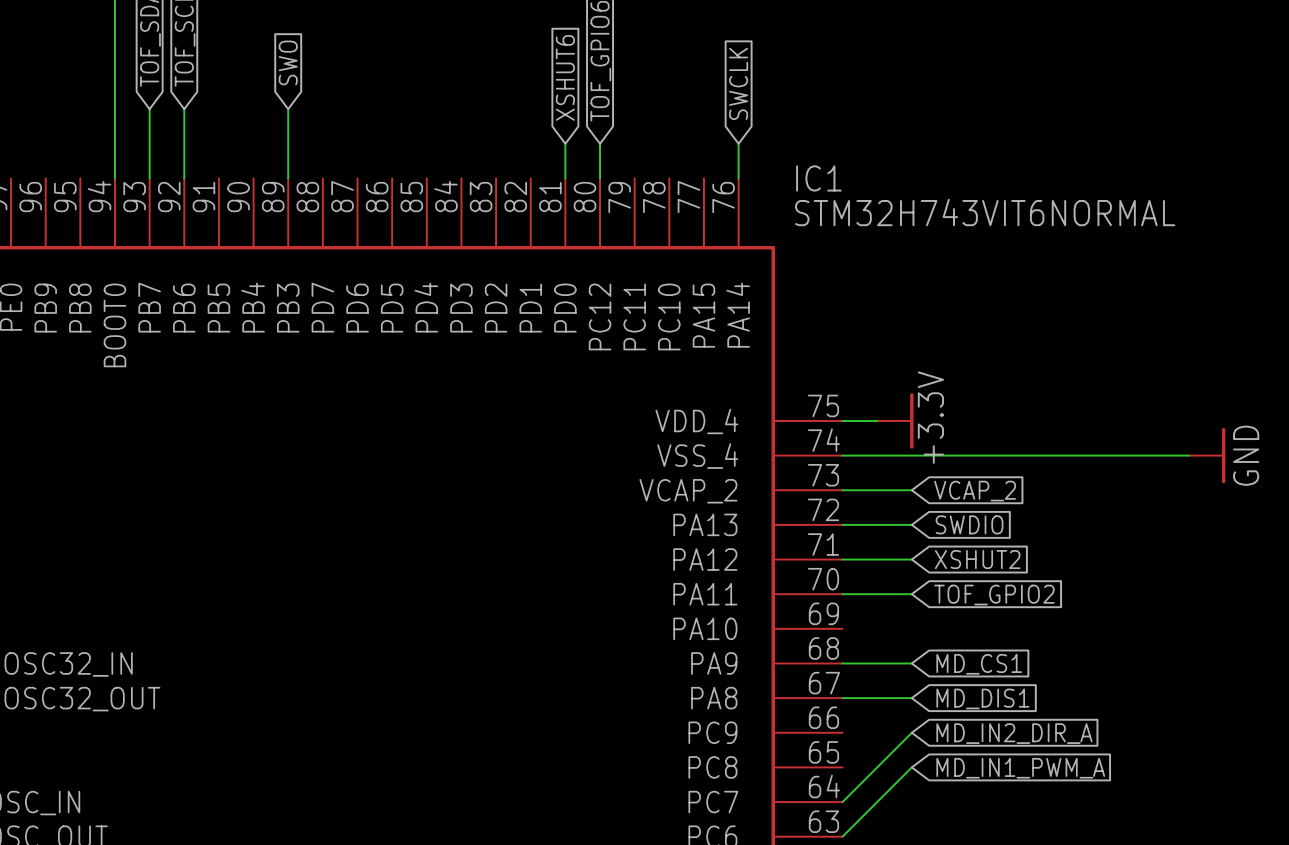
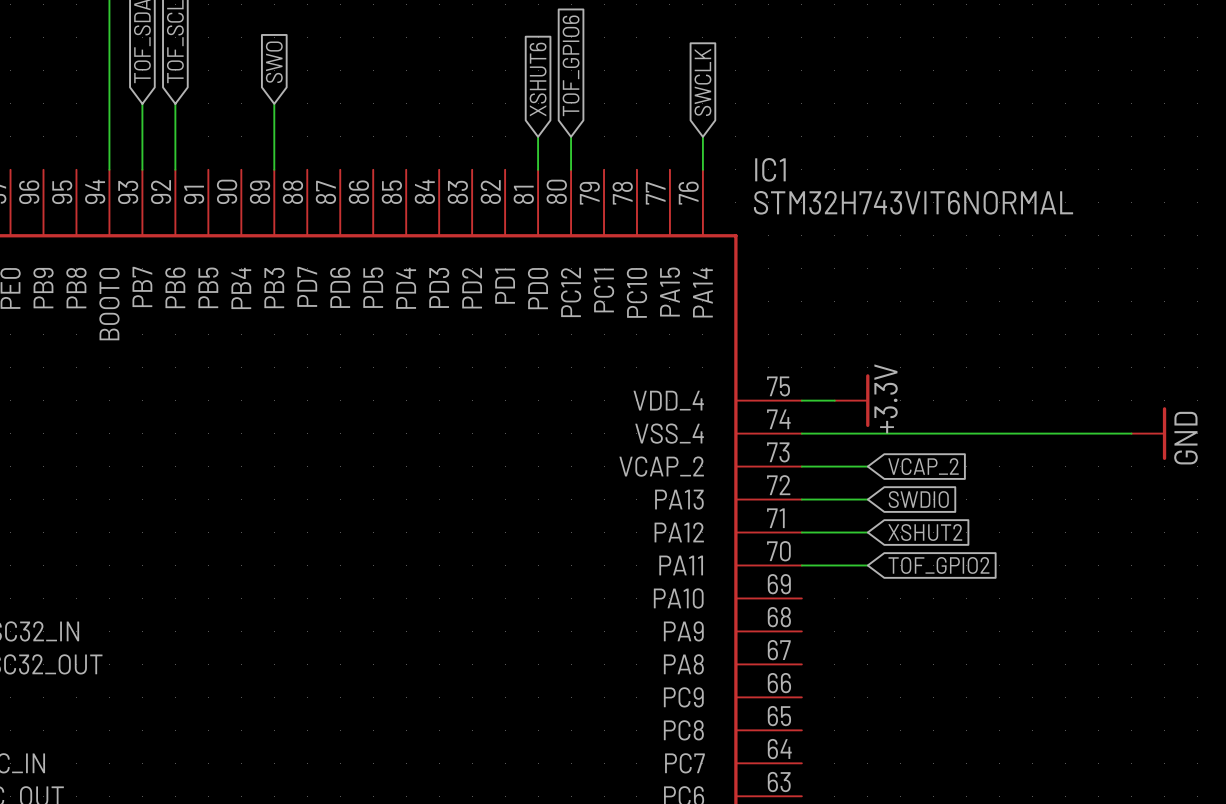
wire: (842, 663) (911, 663) -> none
global label: MD_CS1 (979, 664) -> none
wire: (842, 698) (911, 698) -> none
global label: MD_DIS1 (982, 698) -> none
wire: (911, 732) (842, 802) -> none
global label: MD_IN2_DIR_A (1014, 733) -> none
wire: (911, 767) (842, 836) -> none
global label: MD_IN1_PWM_A (1020, 768) -> none

